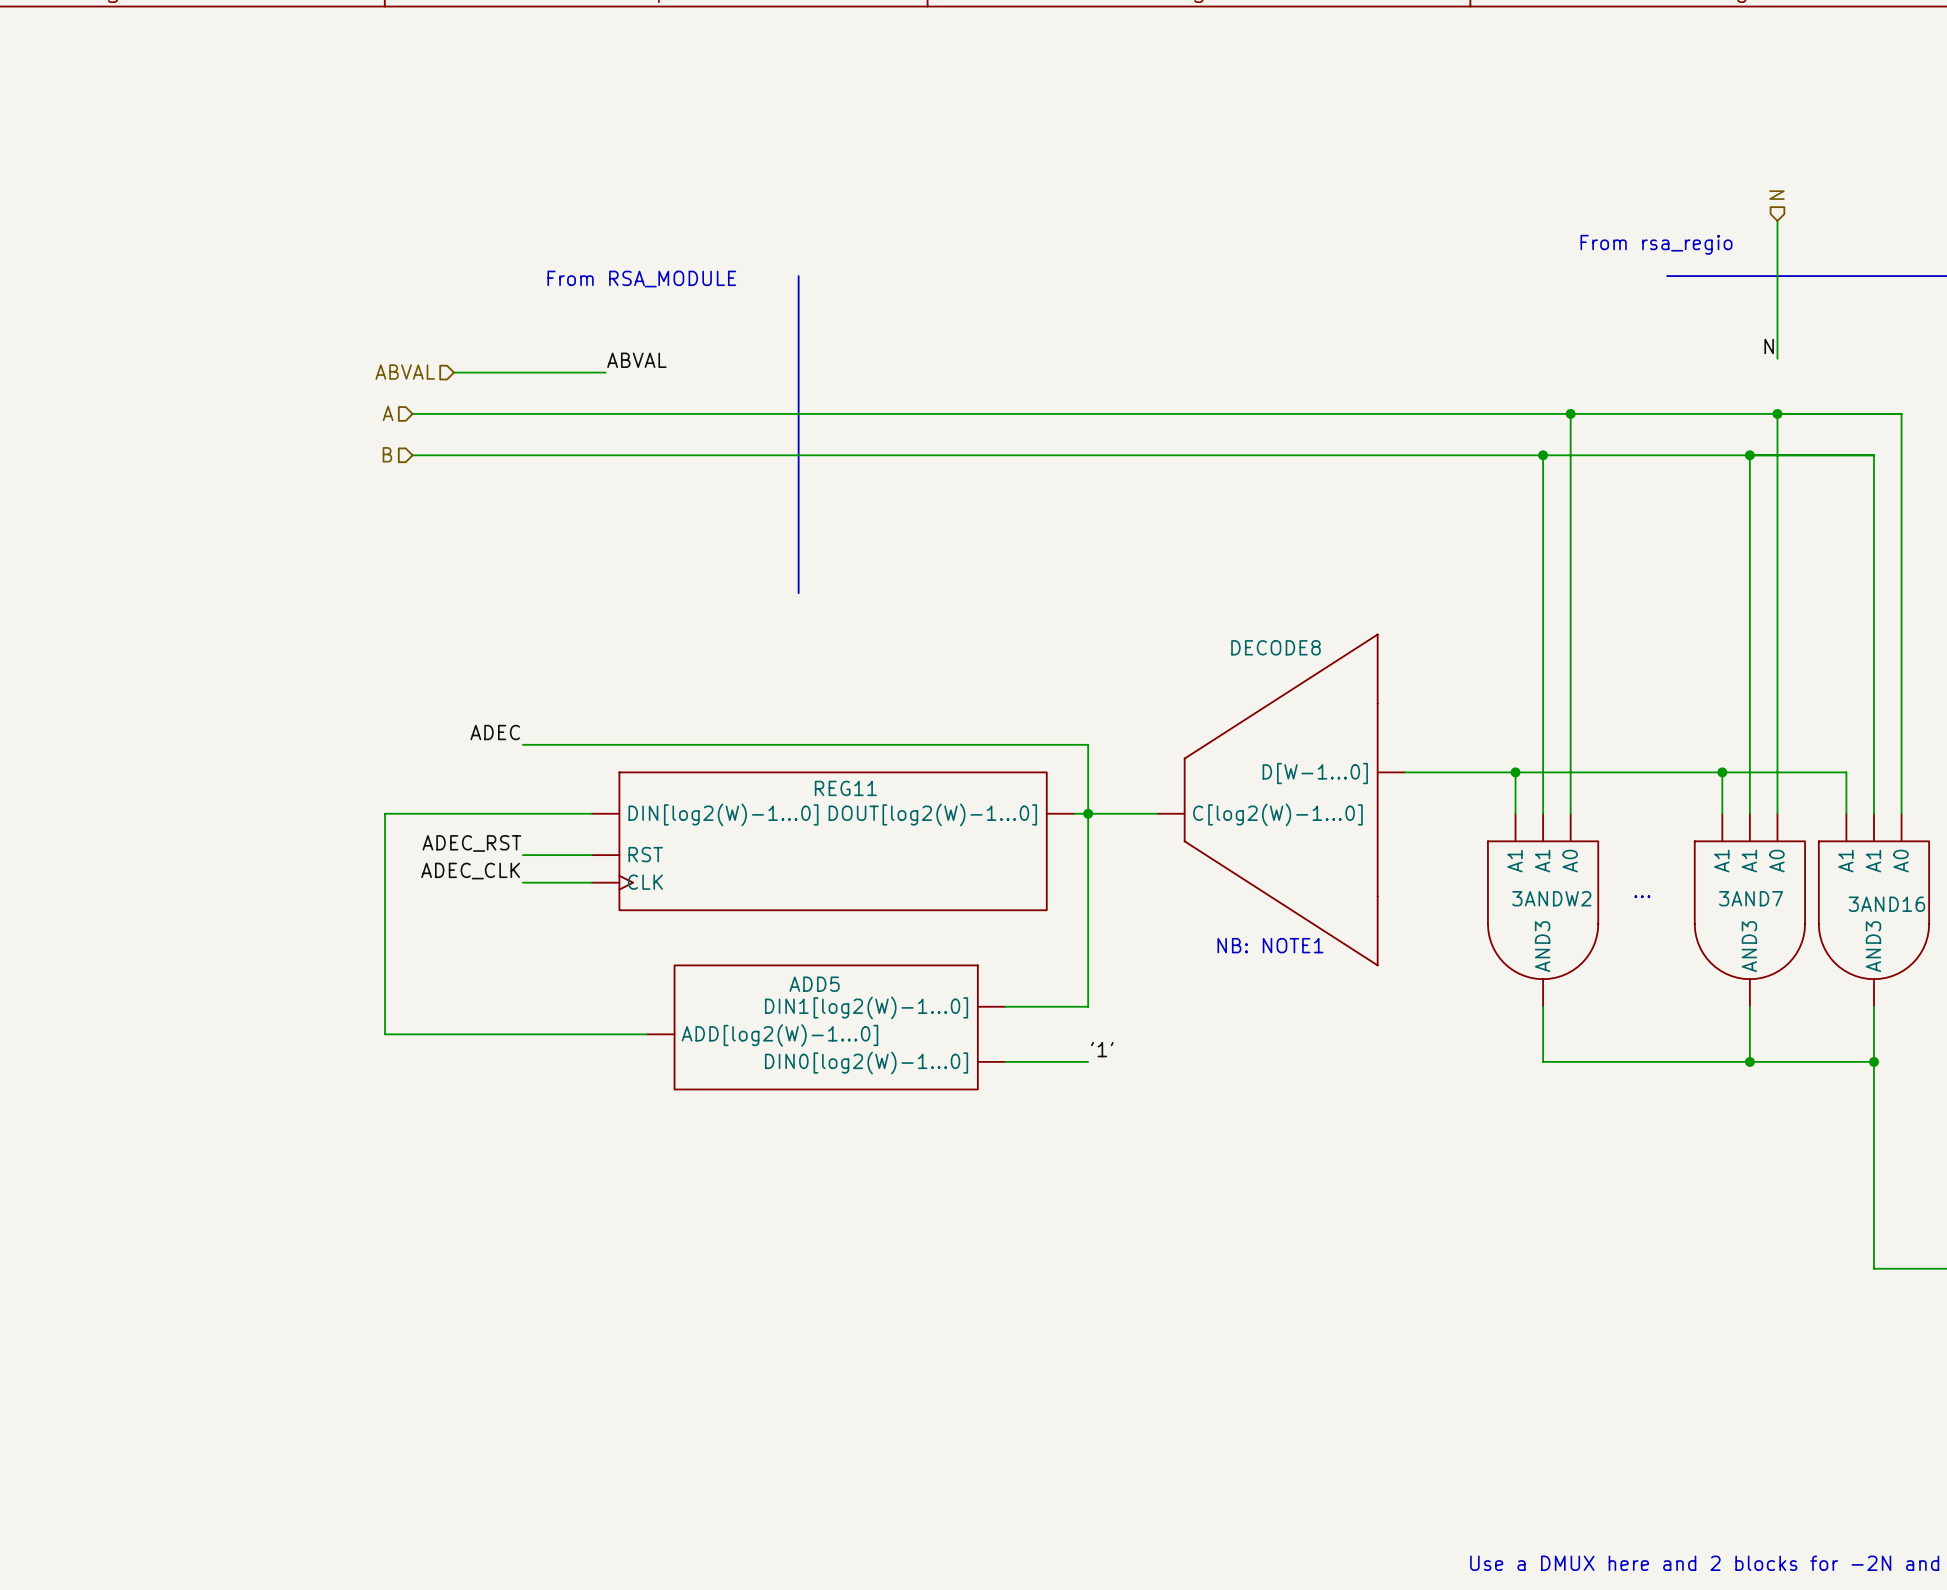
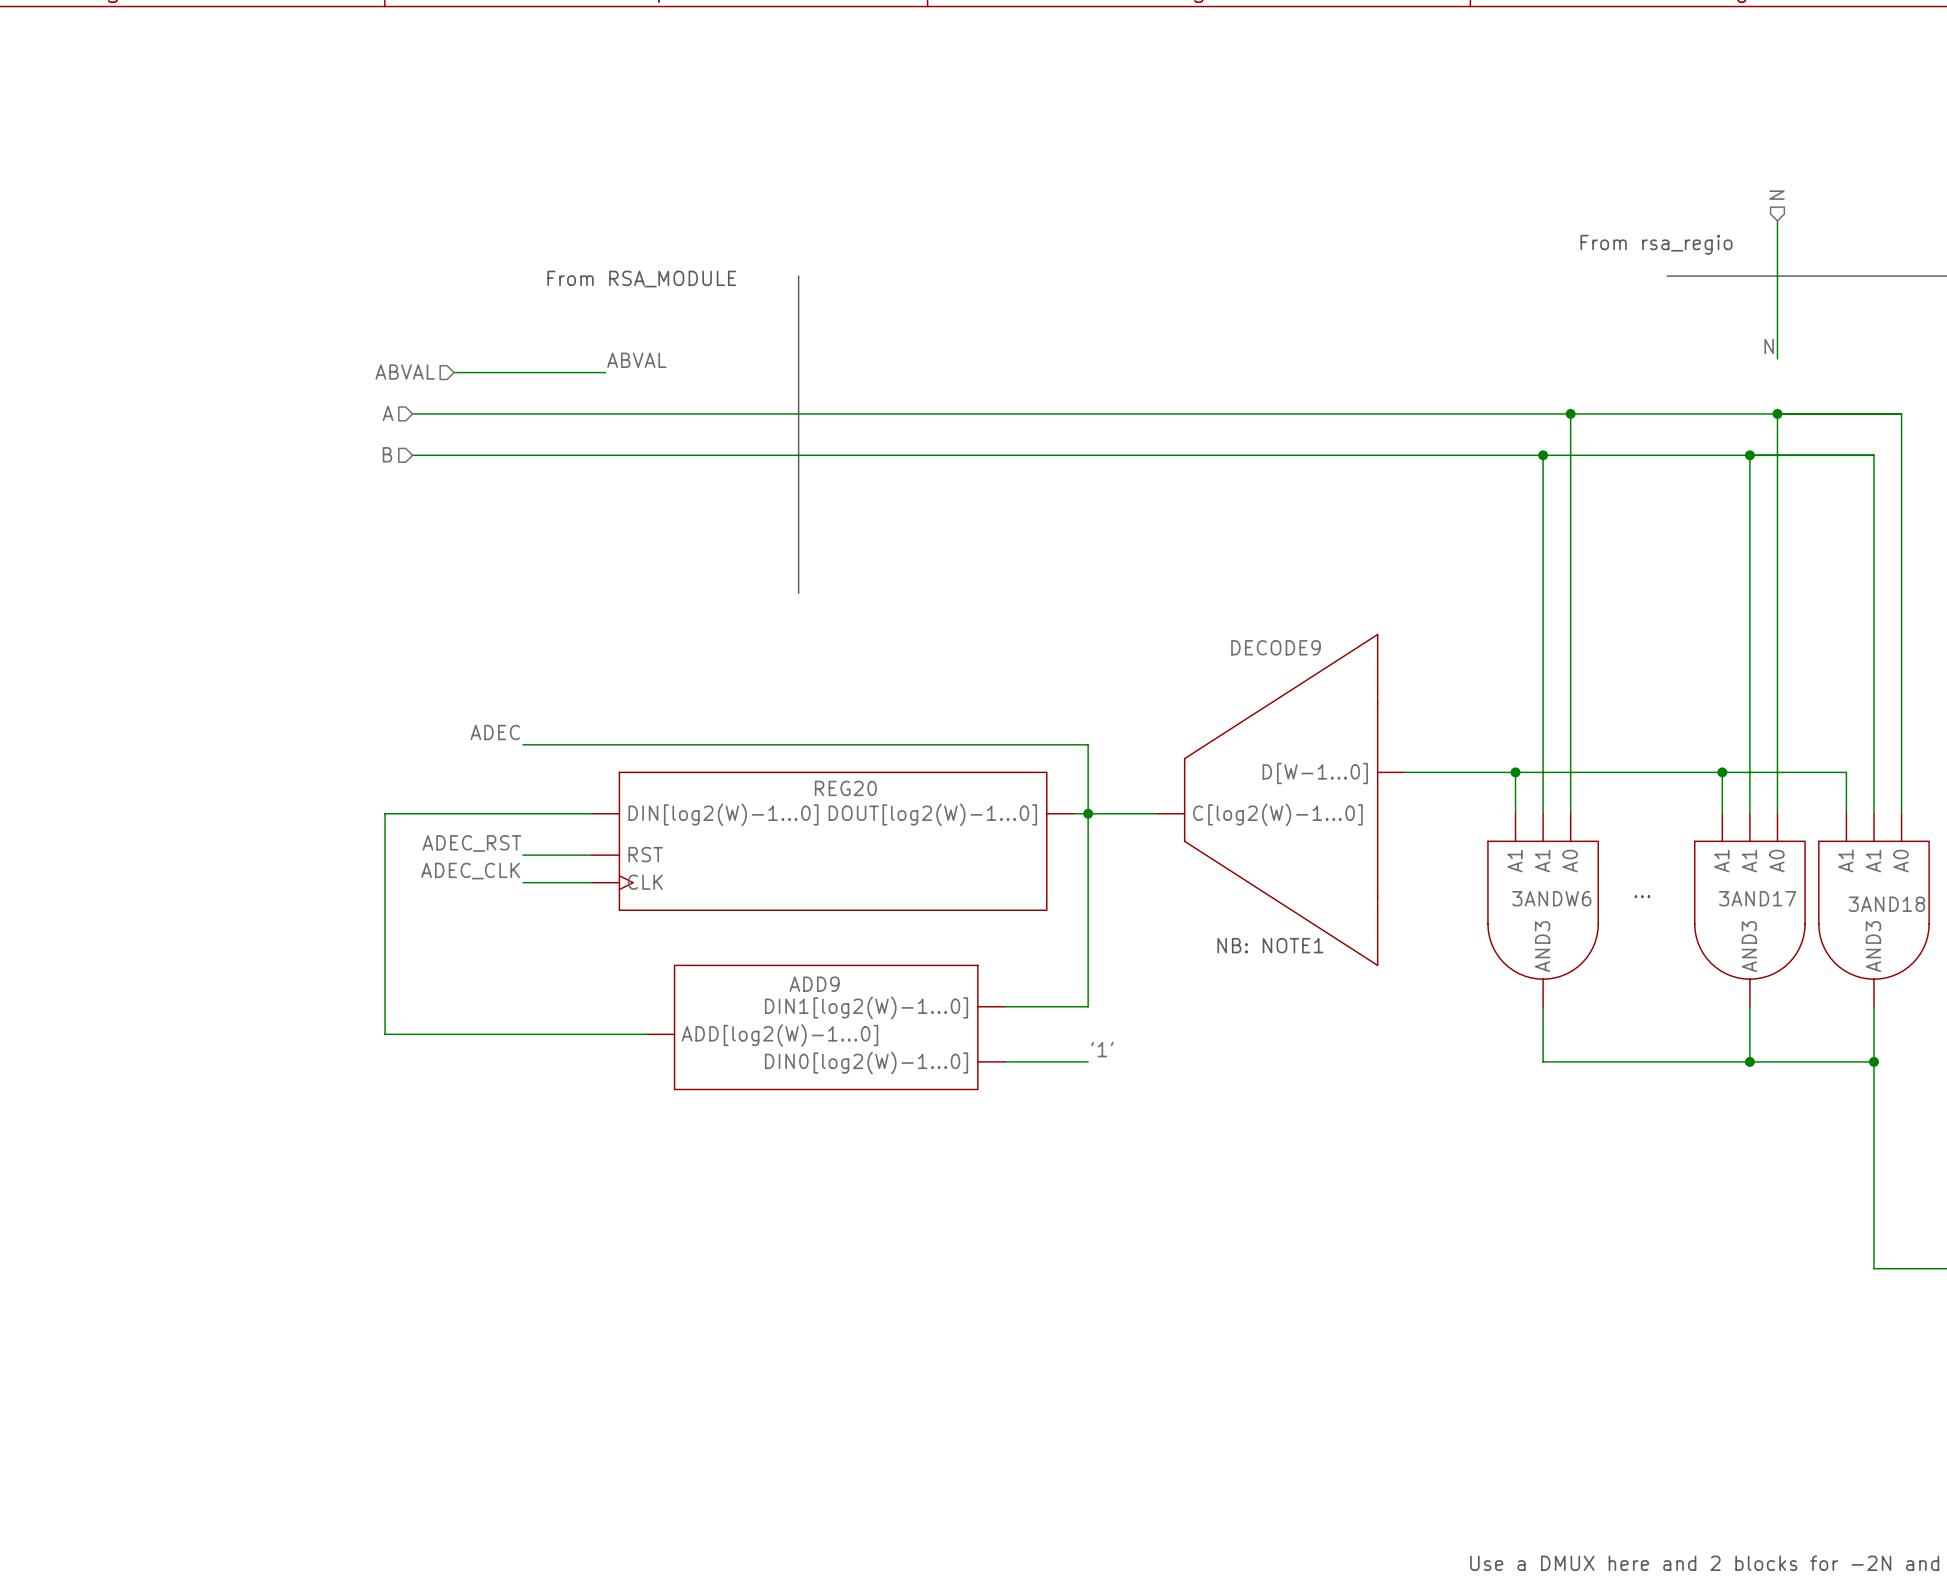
DECODE8 name: DECODE8 (1275, 647) -> DECODE9 (1275, 647)
REG11 name: REG11 (845, 788) -> REG20 (845, 788)
3ANDW2 name: 3ANDW2 (1551, 898) -> 3ANDW6 (1551, 898)
3AND7 name: 3AND7 (1751, 898) -> 3AND17 (1757, 898)
3AND16 name: 3AND16 (1886, 904) -> 3AND18 (1886, 904)
ADD5 name: ADD5 (814, 984) -> ADD9 (814, 984)

